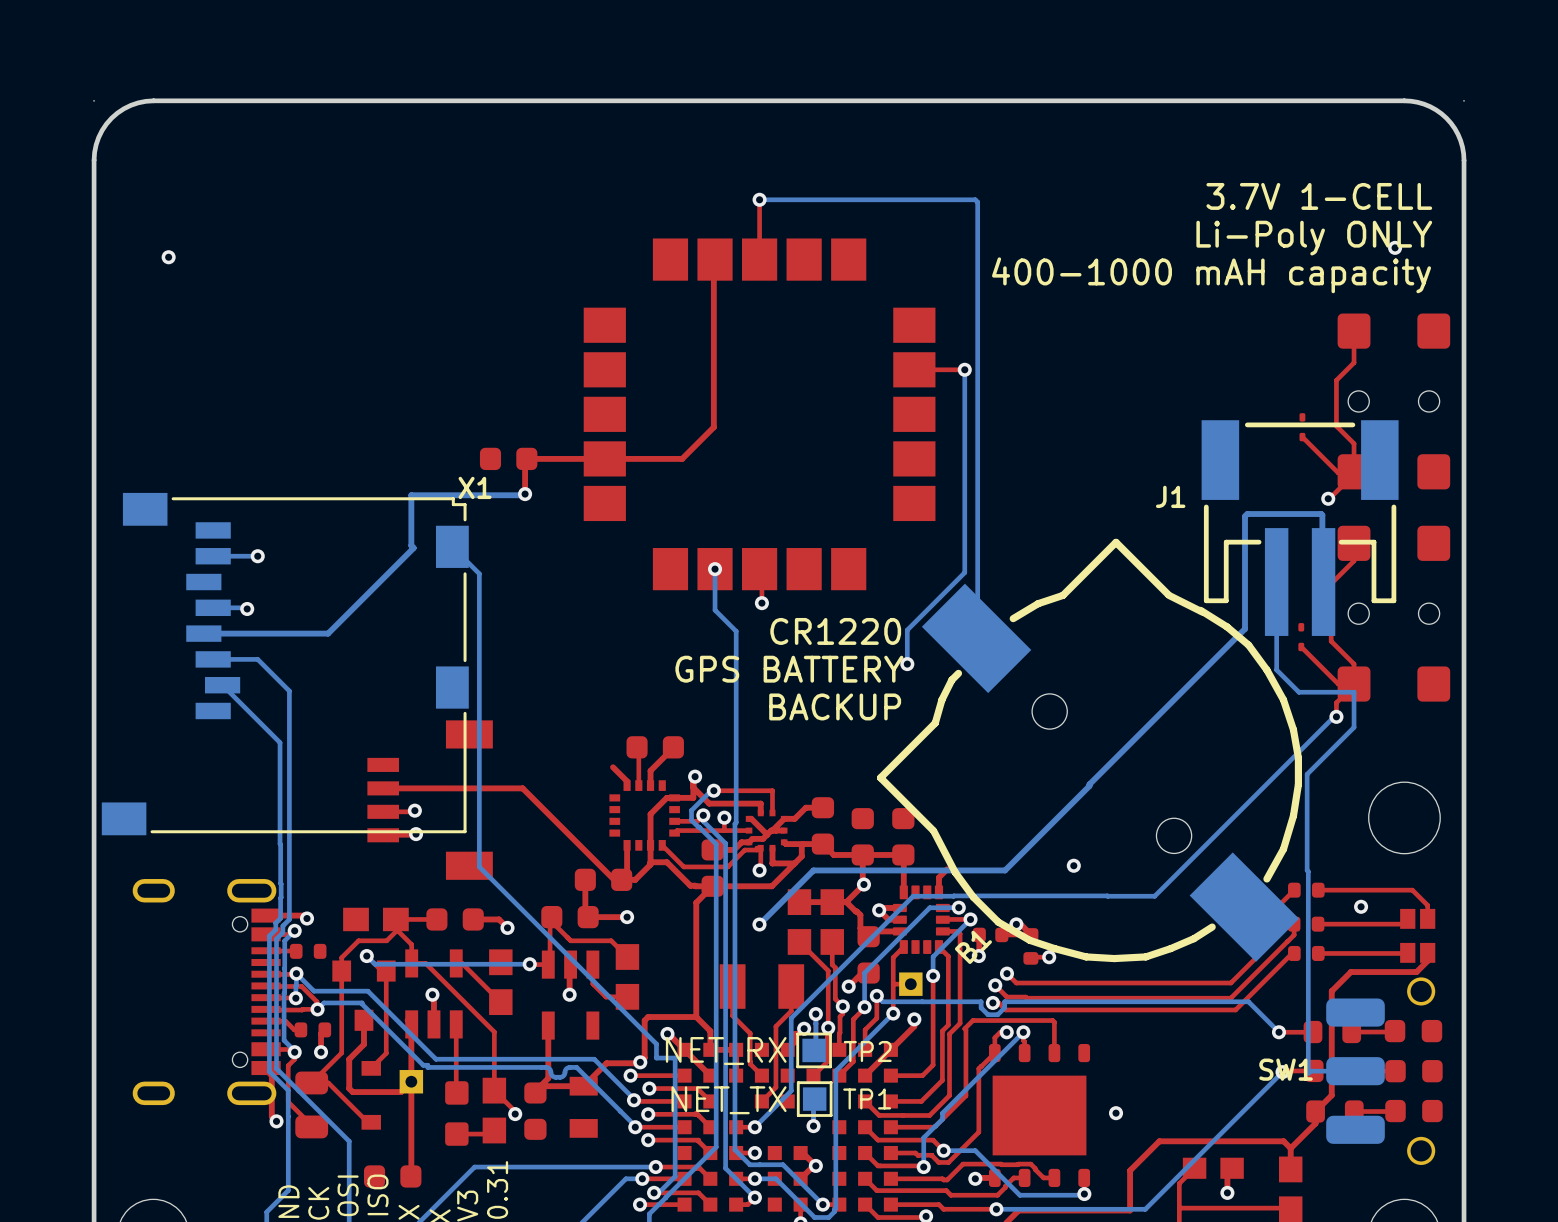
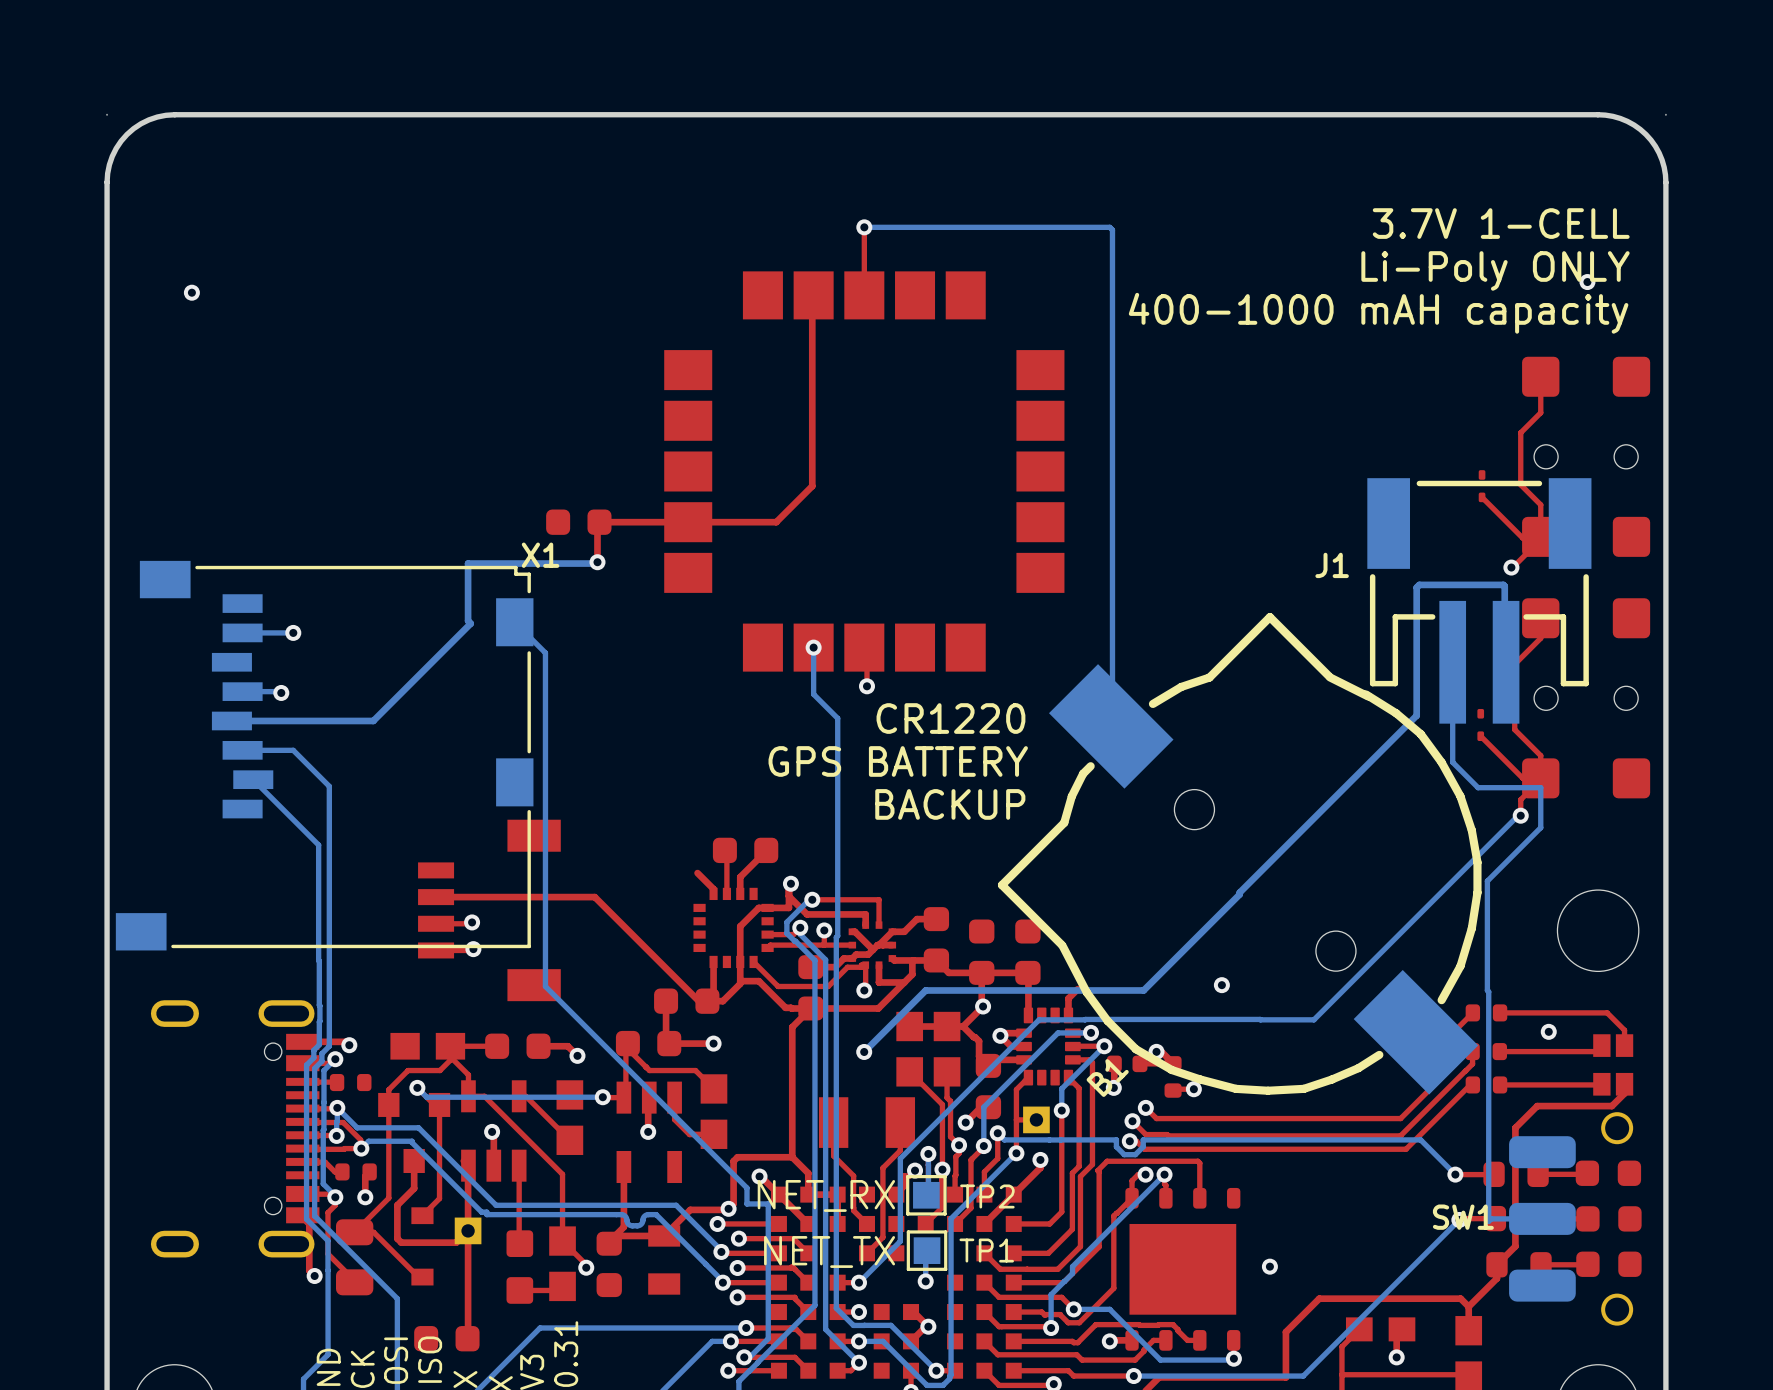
top track: (964, 369) (914, 369) -> none
bottom track: (964, 369) (964, 572) (907, 630) (907, 664) -> none
via: (964, 369) -> none
via: (907, 664) -> none

